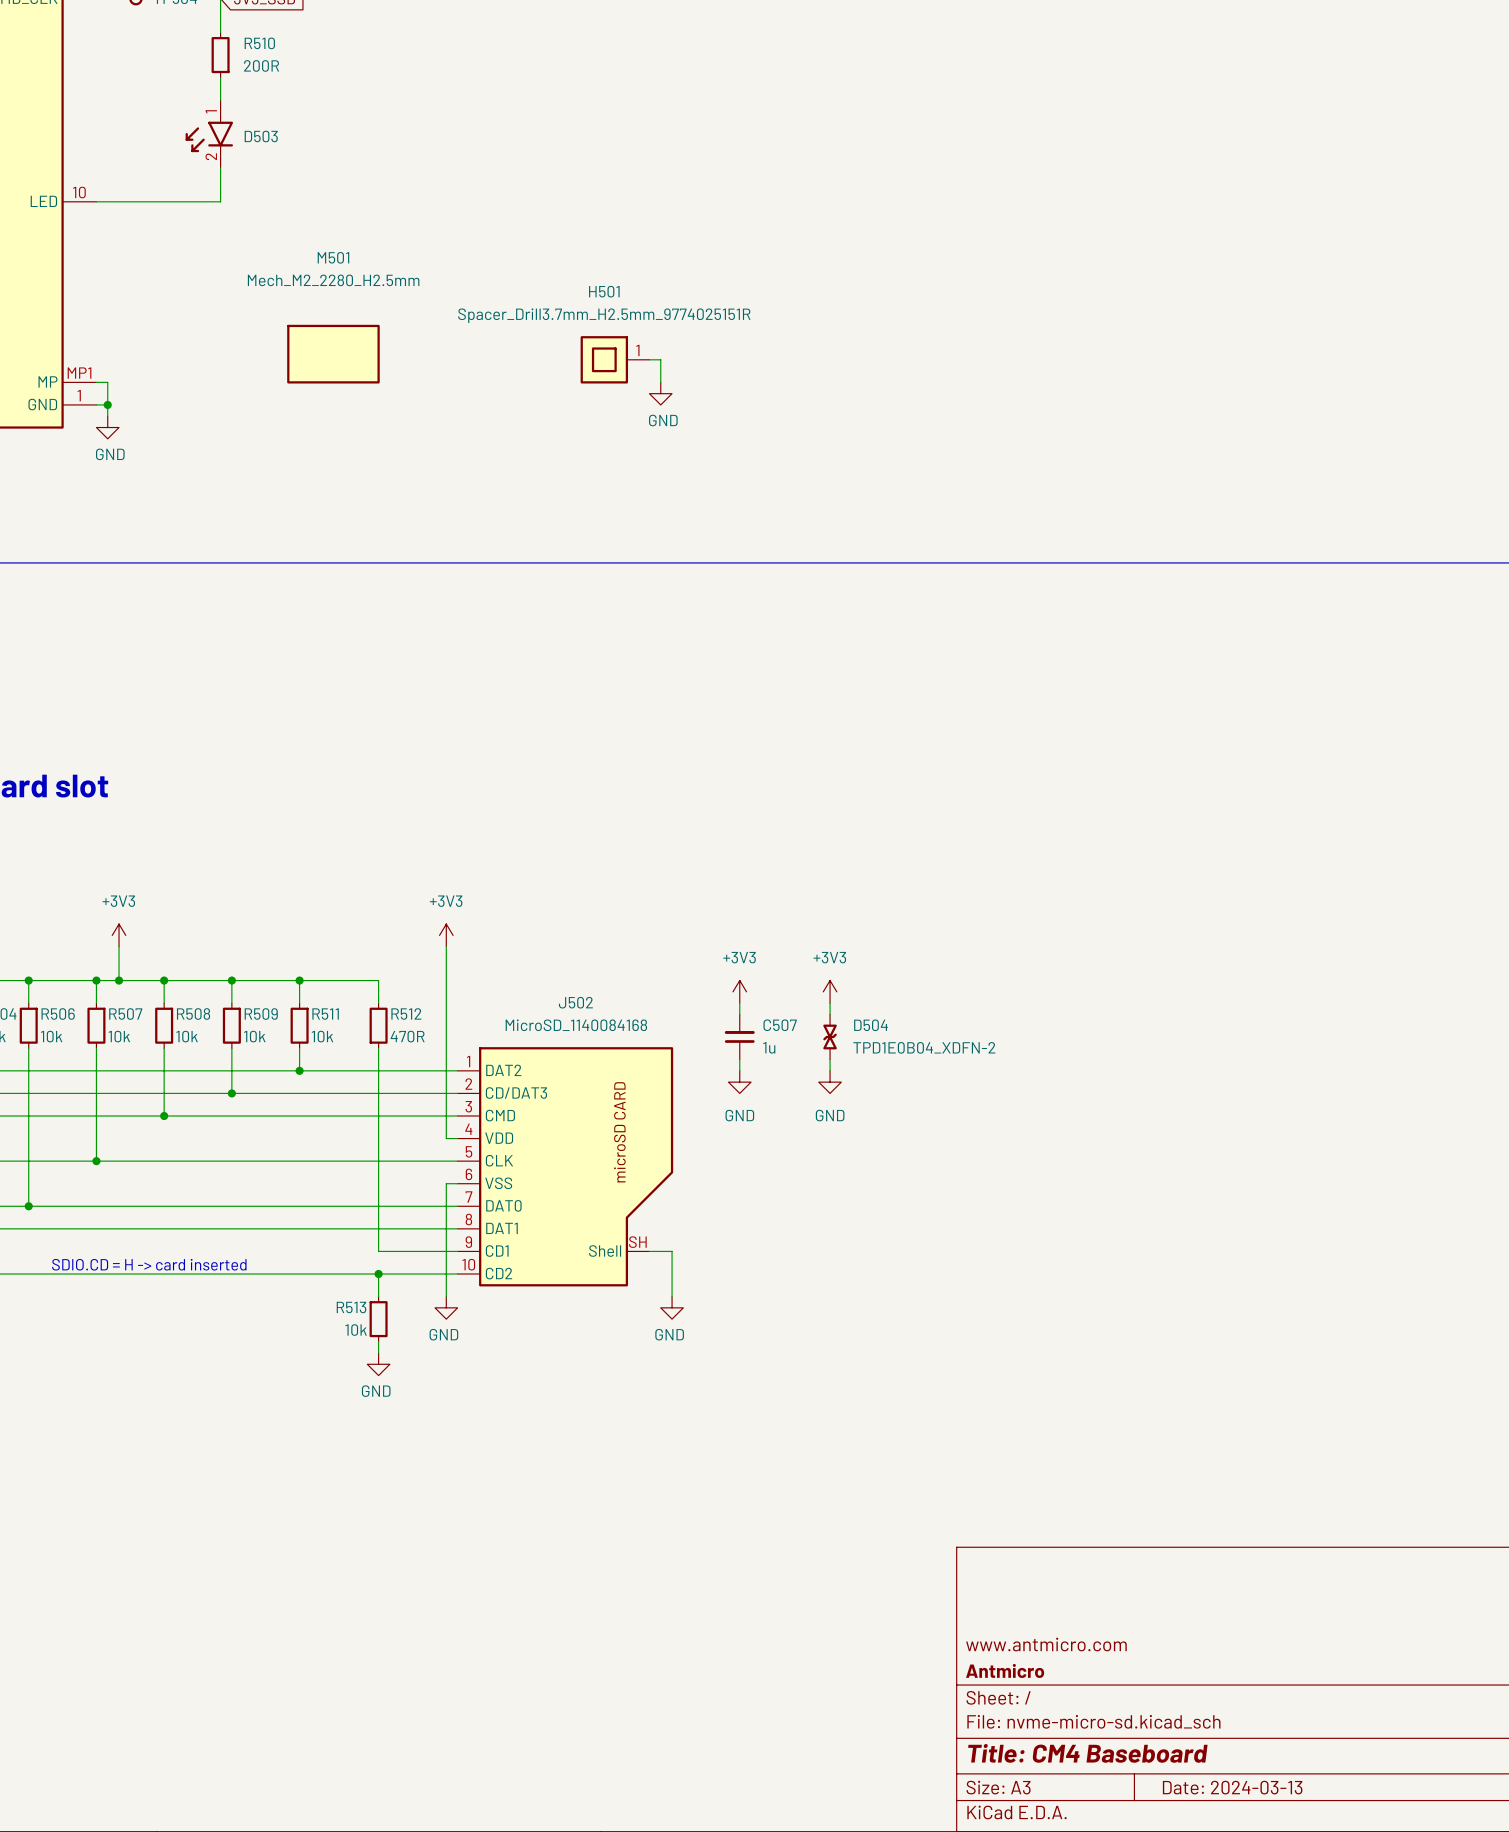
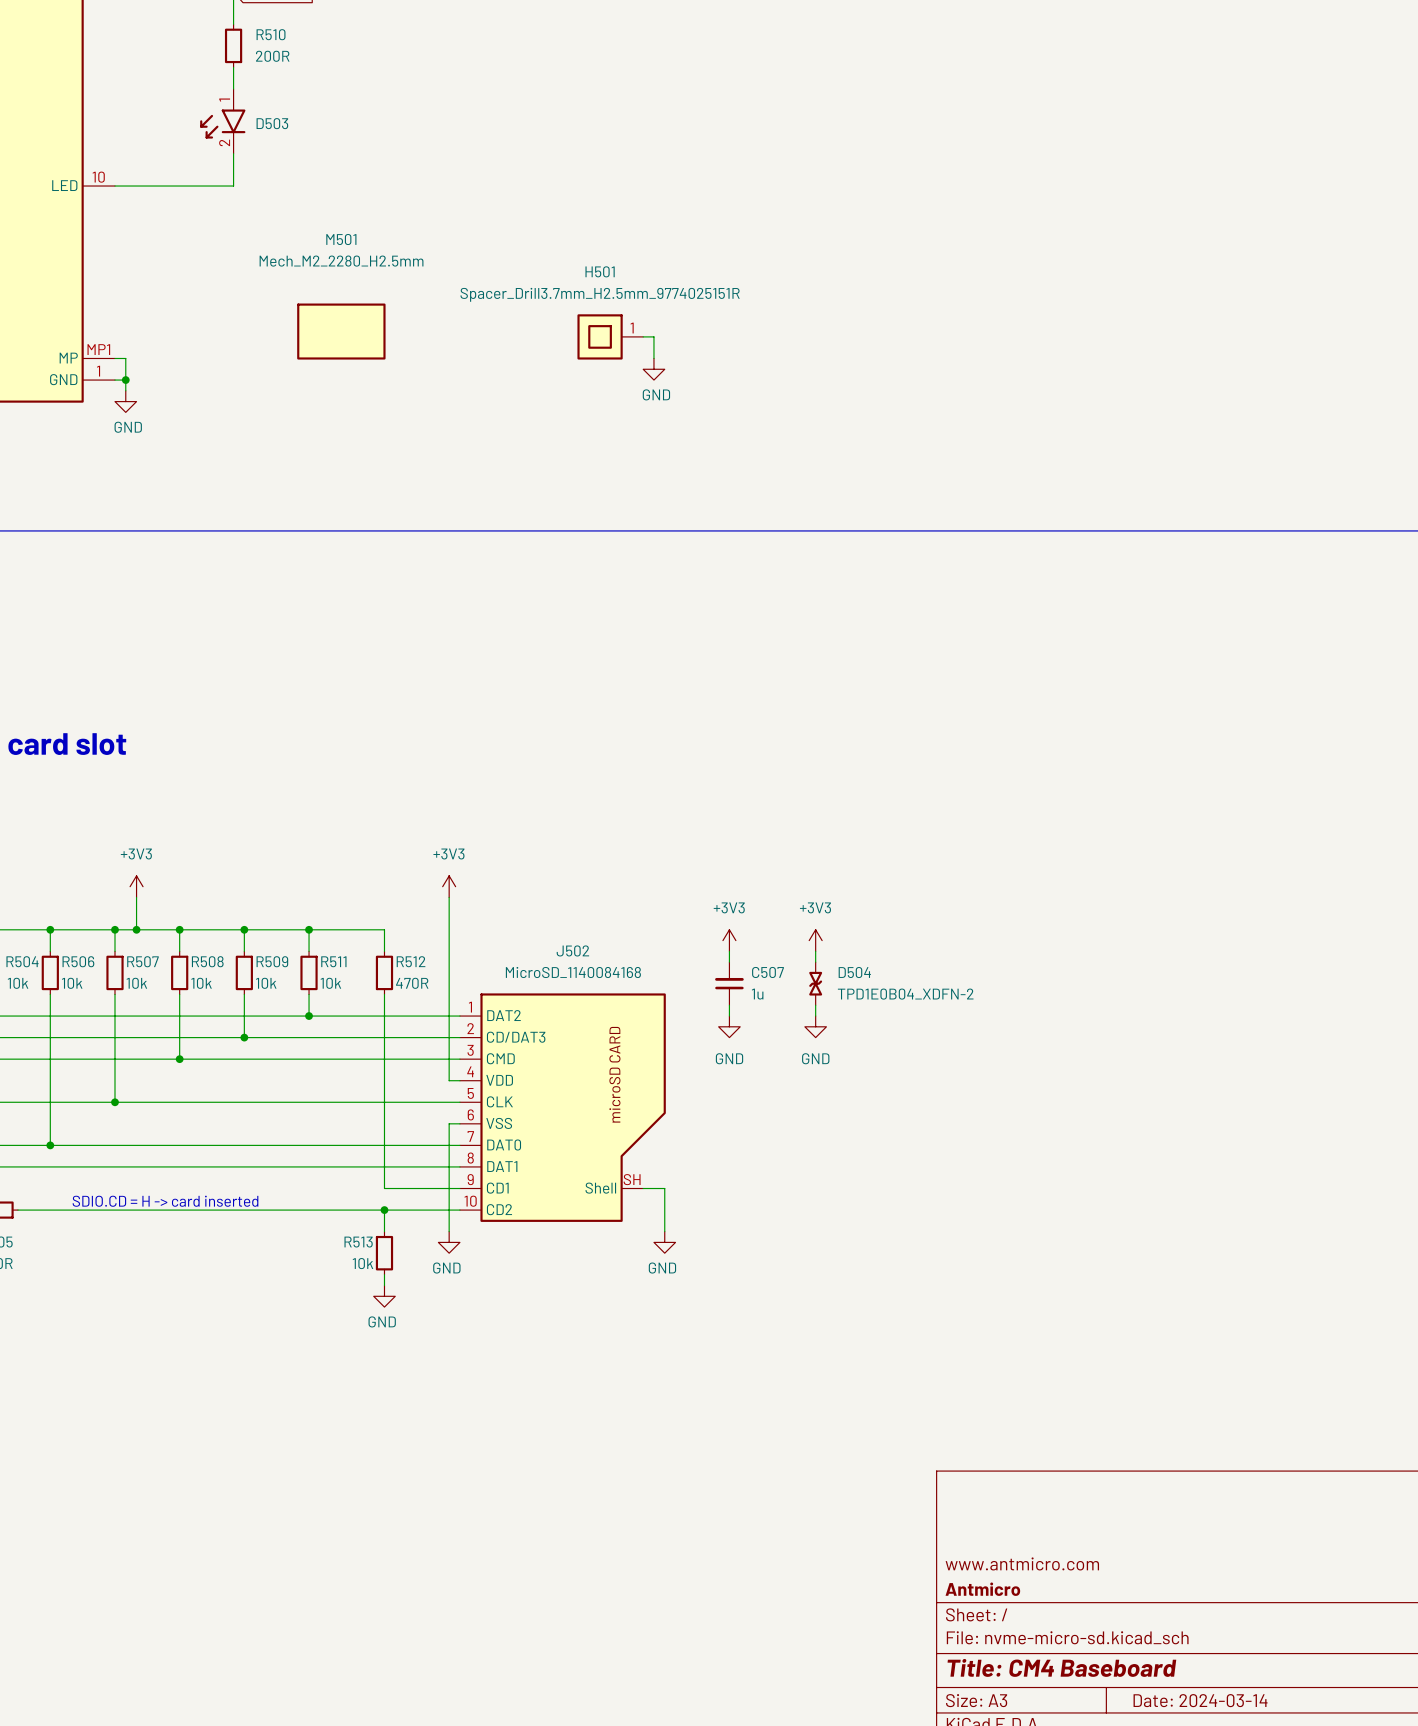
title block: Date: 2024-03-13 (1232, 1787) -> Date: 2024-03-14 (1200, 1700)

